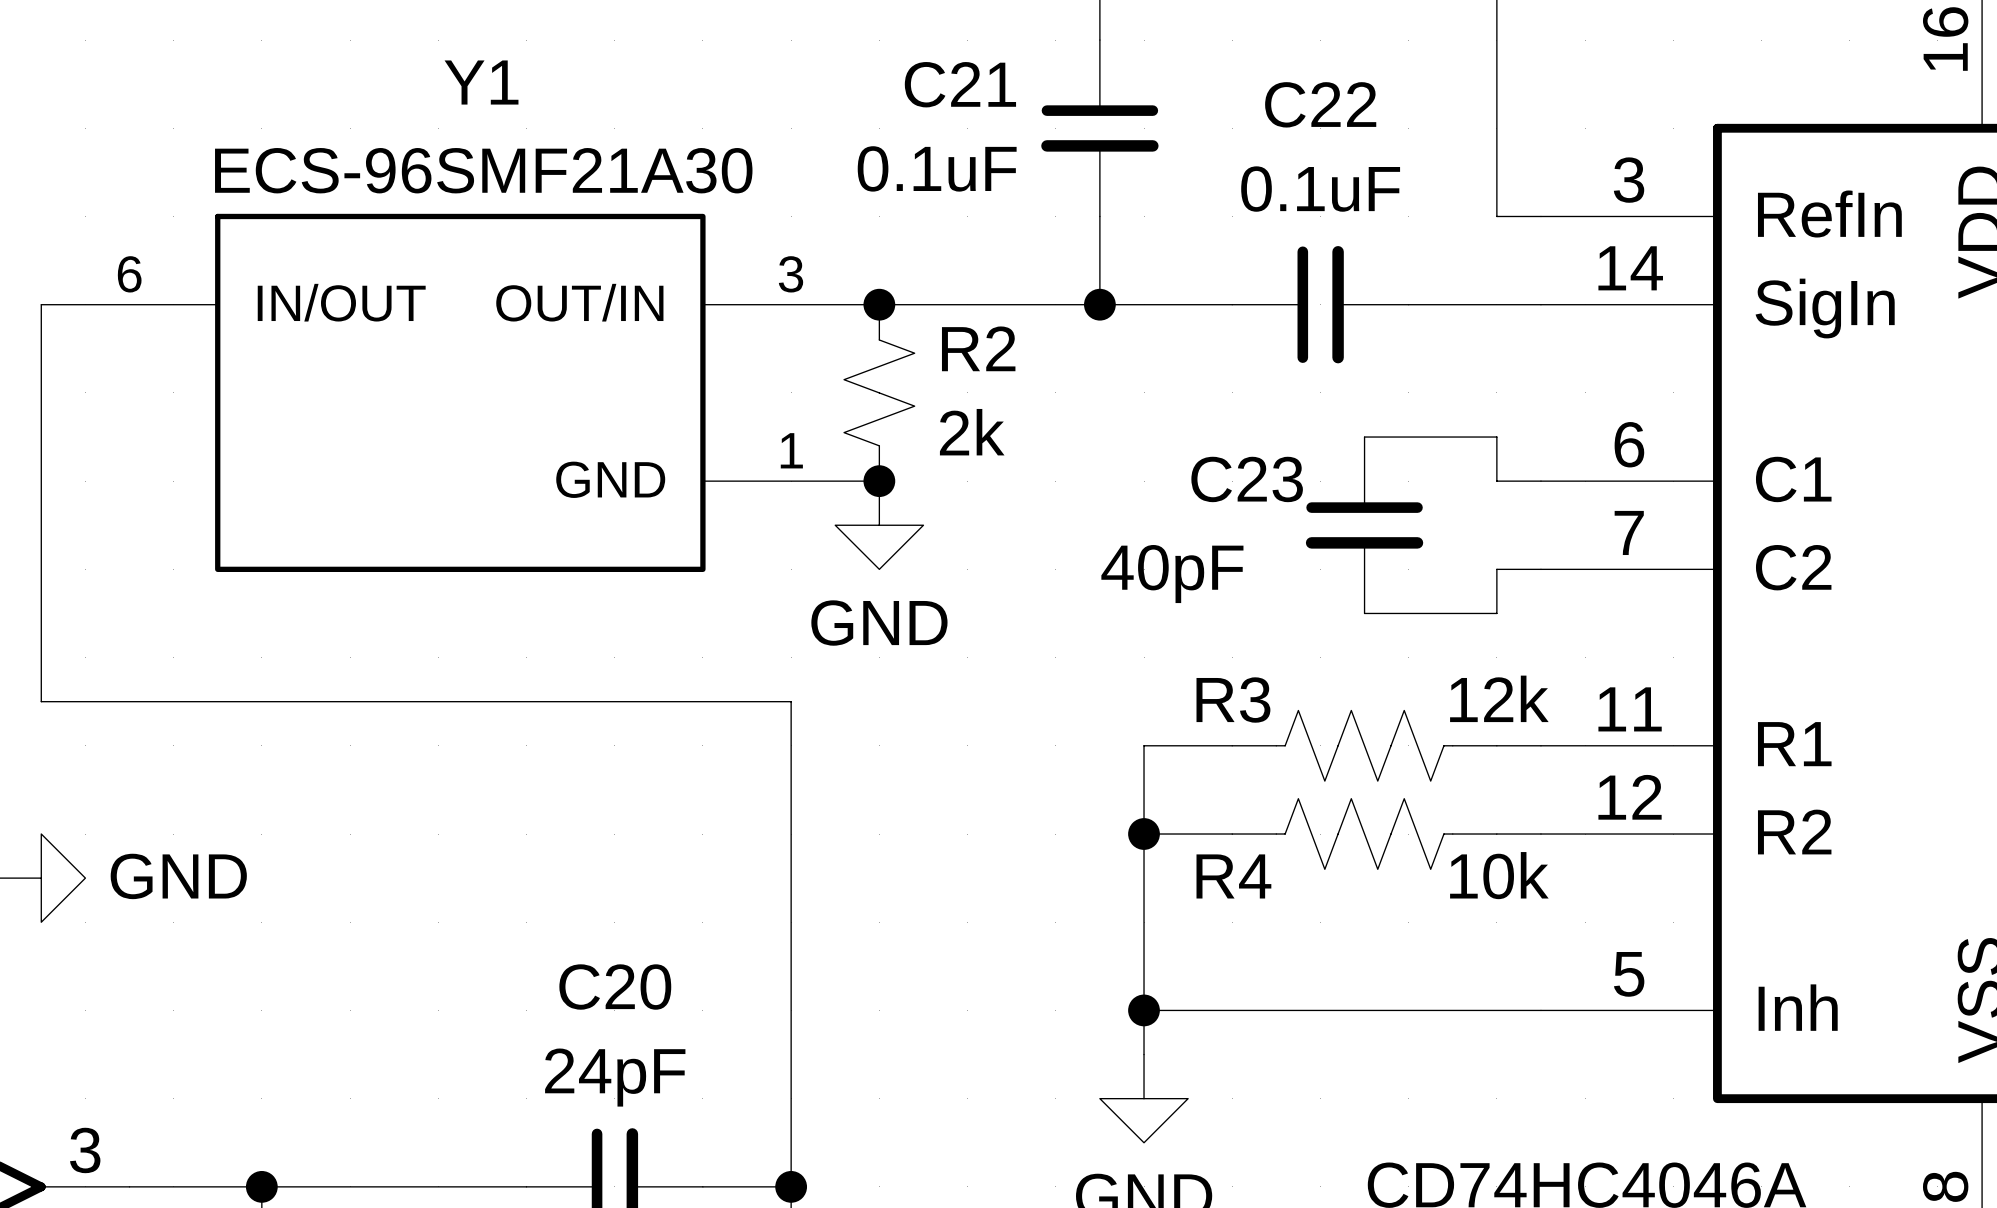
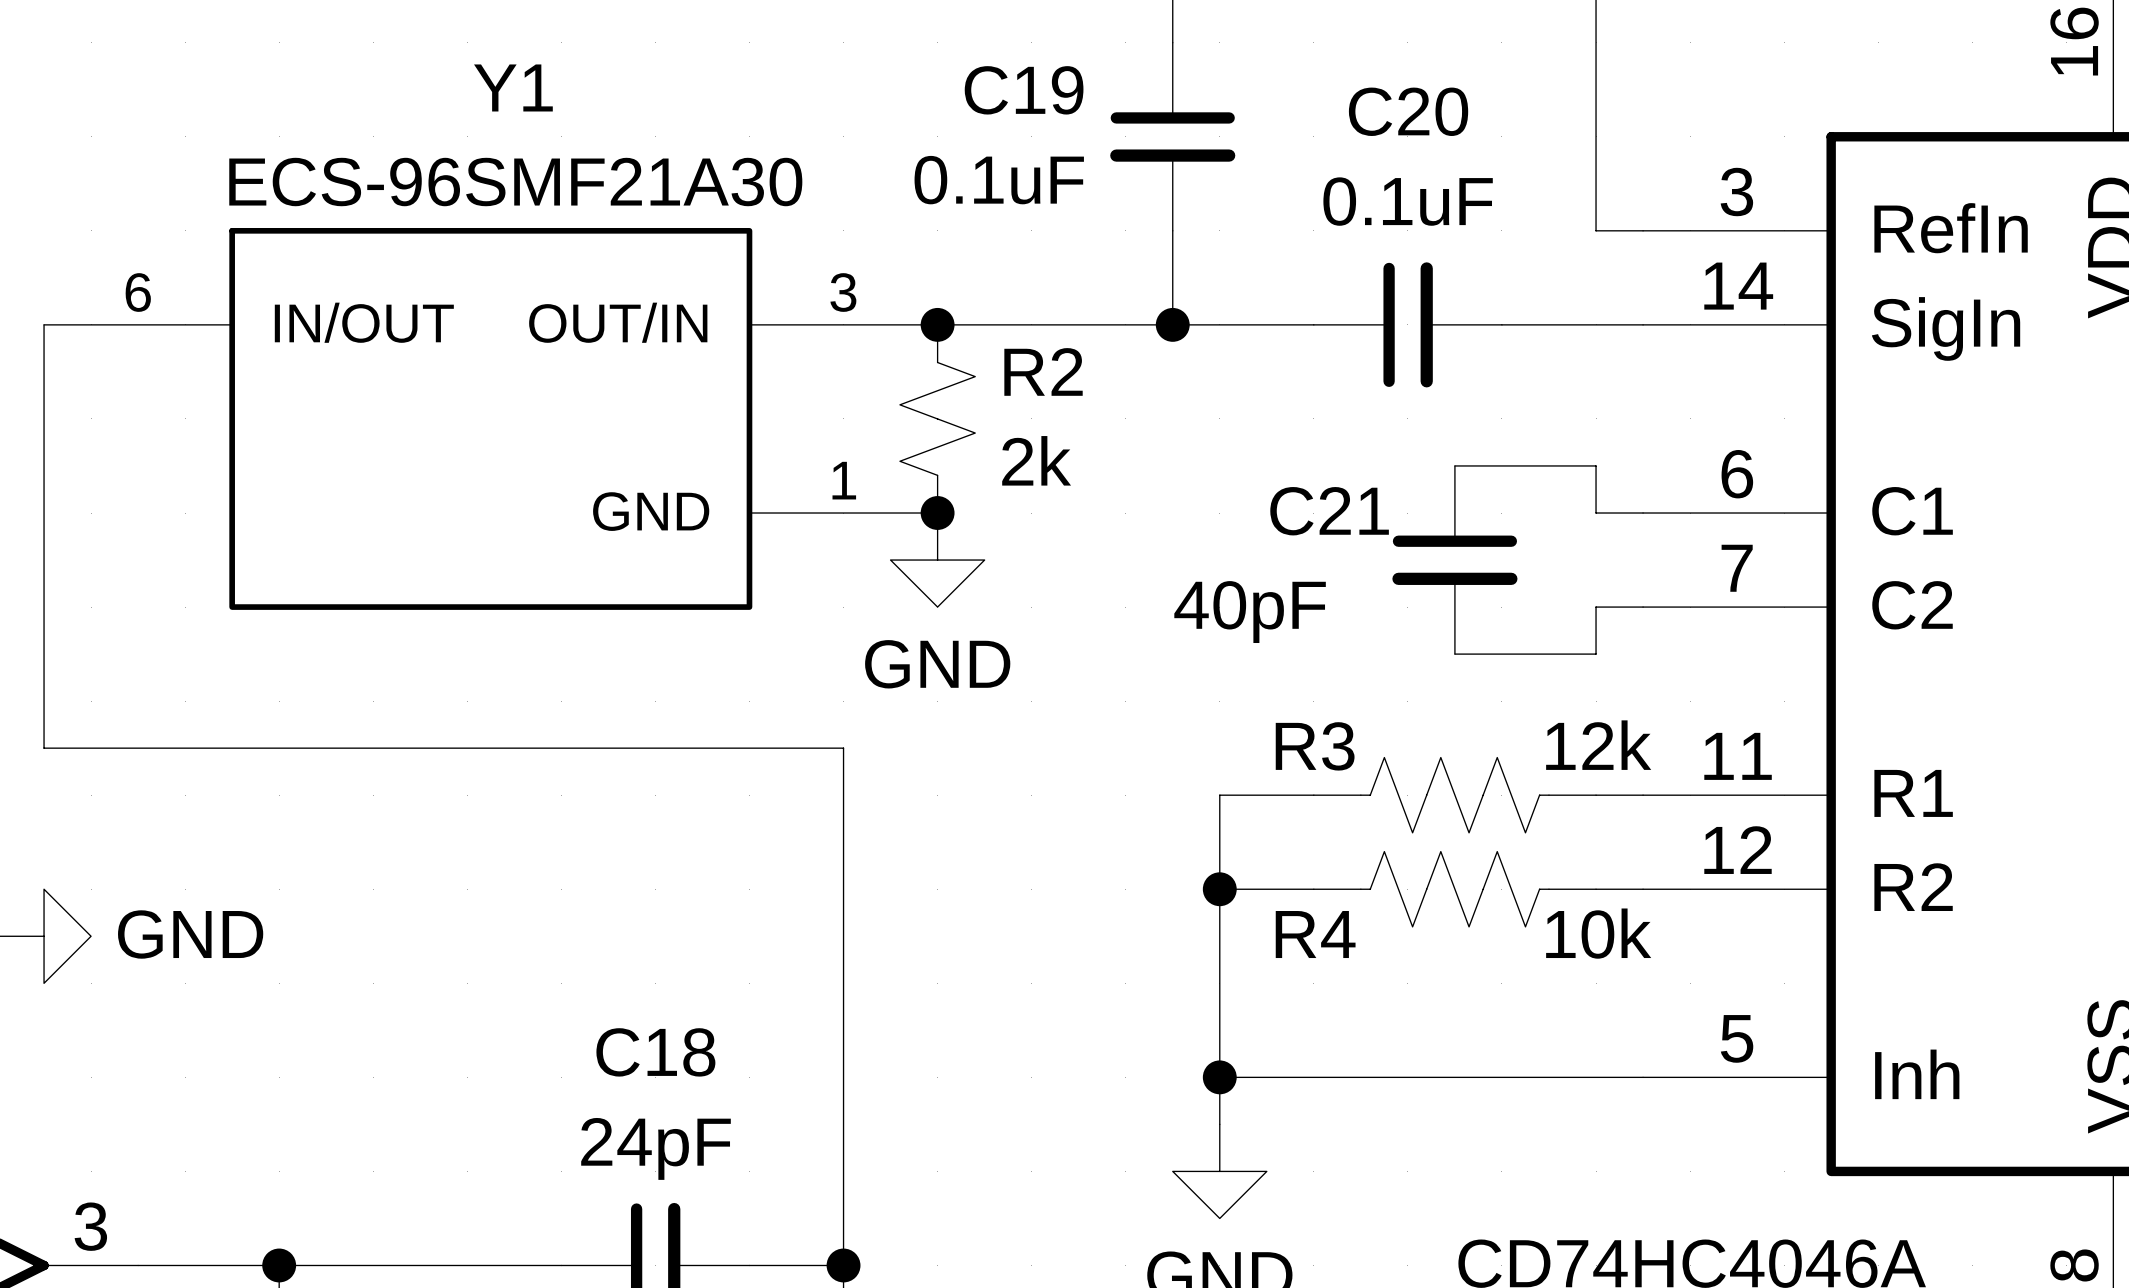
C21 name: C21 (960, 84) -> C19 (1024, 90)
C22 name: C22 (1320, 104) -> C20 (1408, 111)
C23 name: C23 (1247, 479) -> C21 (1329, 511)
C20 name: C20 (615, 987) -> C18 (655, 1052)

